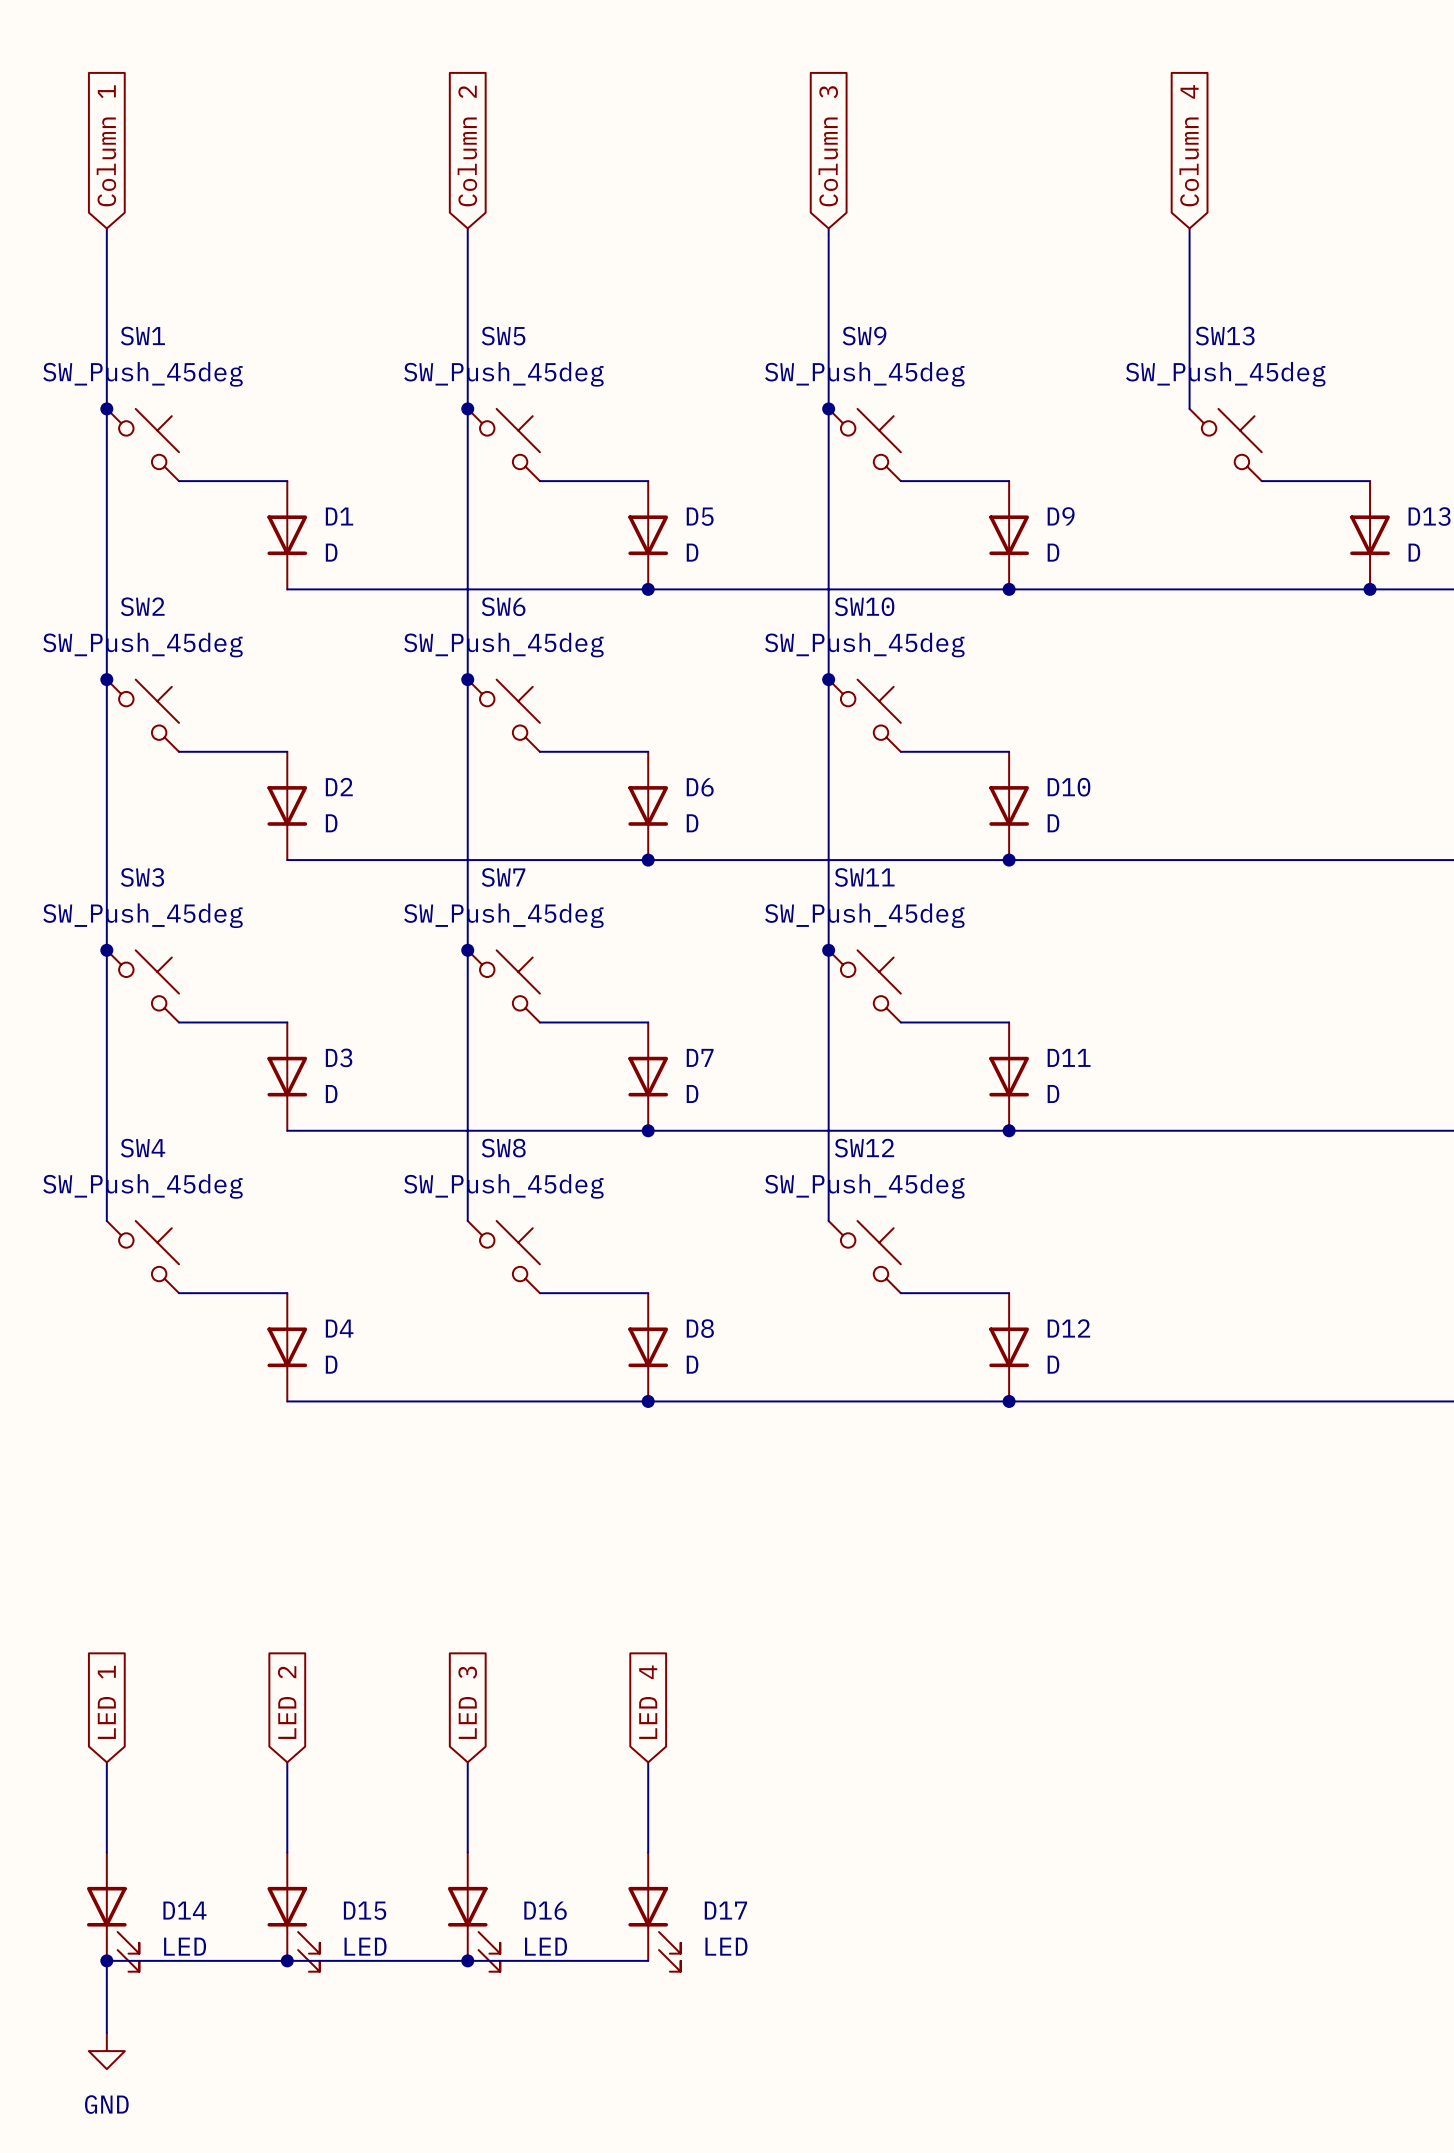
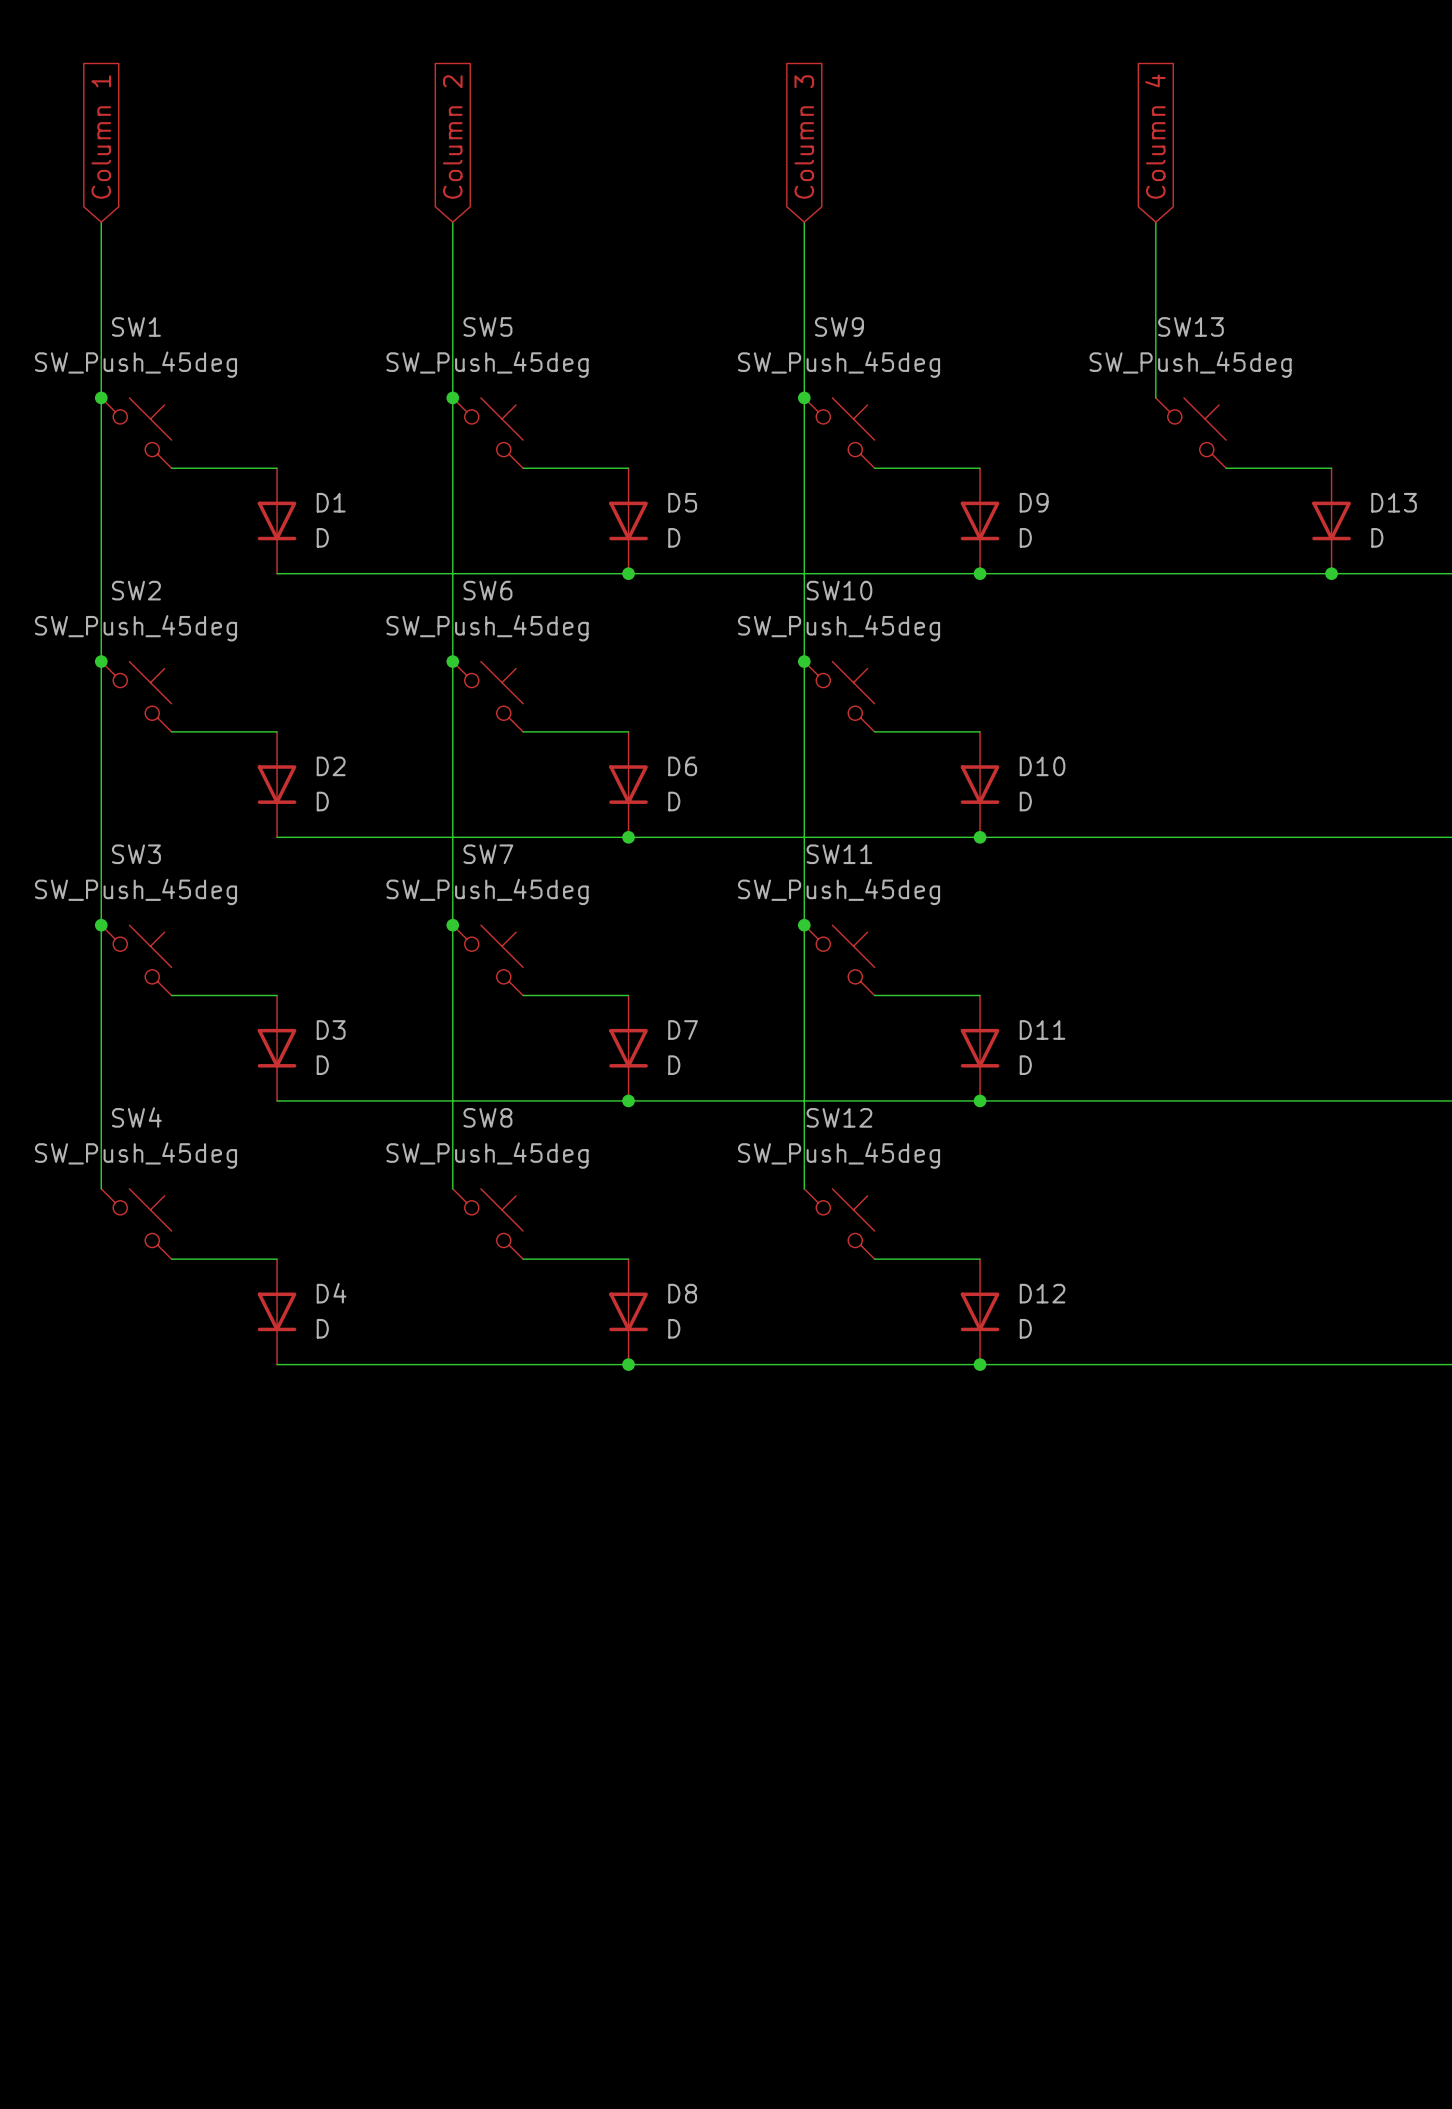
global label: LED 1 (106, 1702) -> none
global label: LED 2 (287, 1702) -> none
global label: LED 3 (467, 1702) -> none
global label: LED 4 (648, 1702) -> none
wire: (106, 1762) (106, 1852) -> none
wire: (287, 1762) (287, 1852) -> none
wire: (467, 1762) (467, 1852) -> none
wire: (648, 1762) (648, 1852) -> none
D14: LED (113, 1912) -> none
D15: LED (293, 1912) -> none
D16: LED (474, 1912) -> none
D17: LED (654, 1912) -> none
junction: (106, 1960) -> none
junction: (287, 1960) -> none
junction: (467, 1960) -> none
wire: (648, 1960) (106, 1960) (106, 2033) -> none
power symbol: GND (106, 2051) -> none

